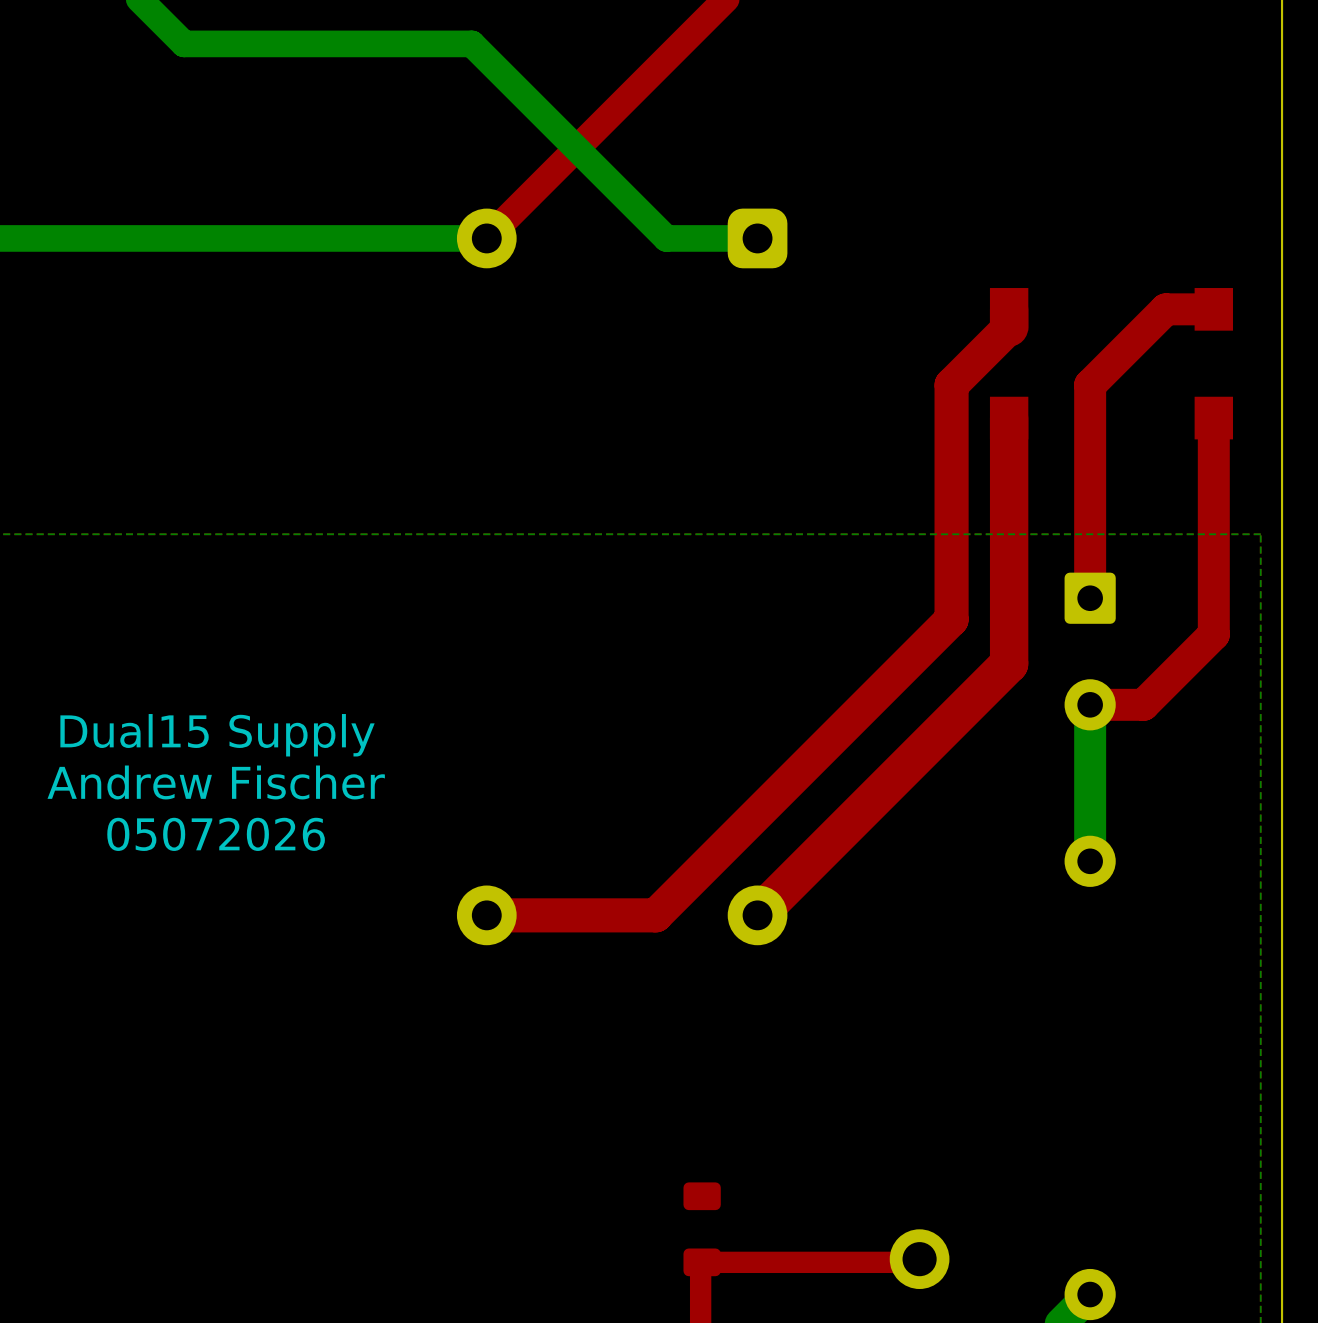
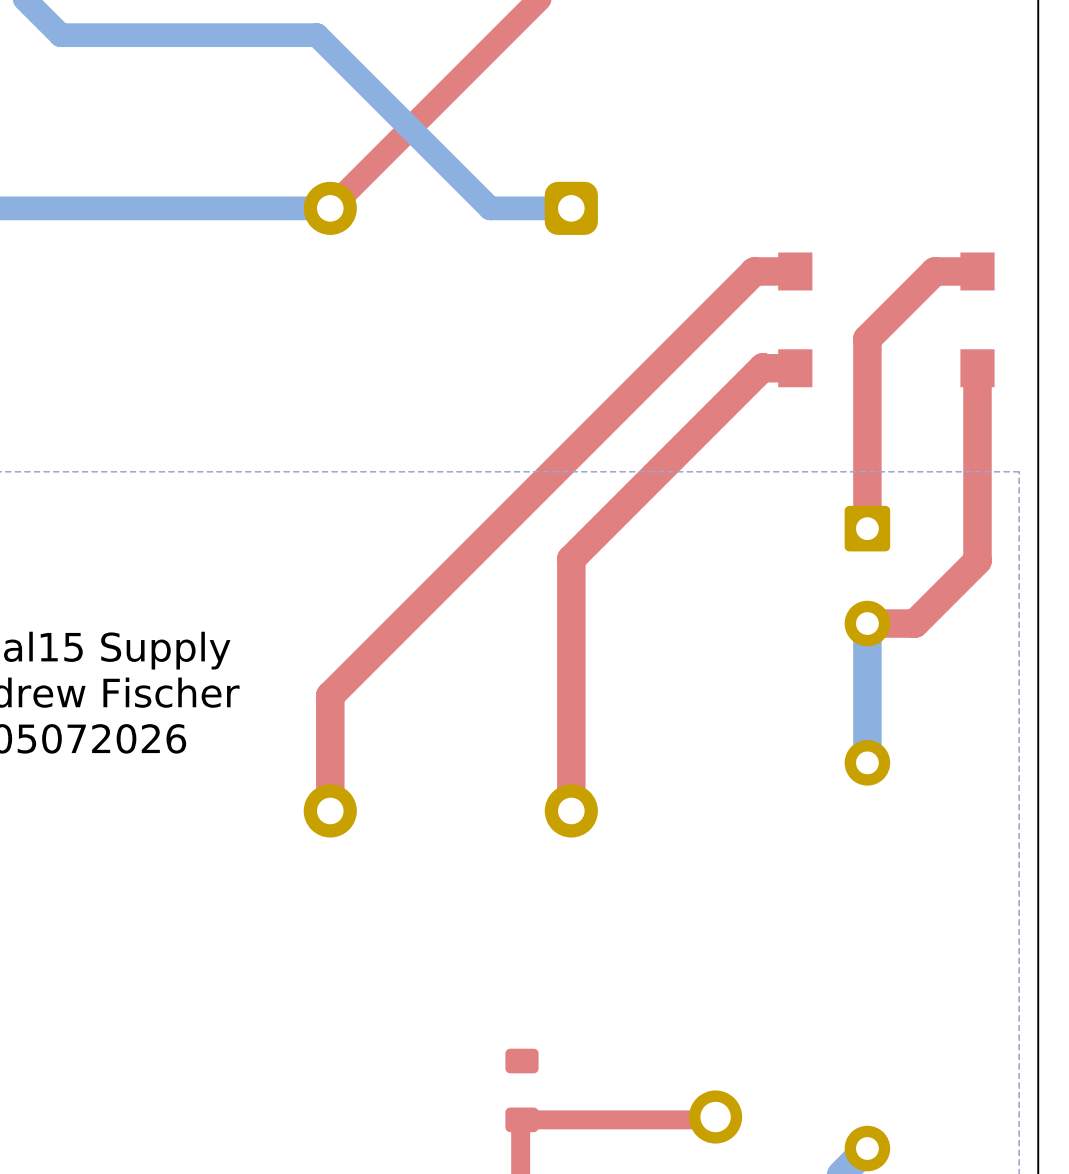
top track: (1009, 309) (1009, 327) (951, 385) (951, 619) (655, 915) (486, 915) -> (795, 271) (754, 271) (330, 695) (330, 810)
top track: (1009, 418) (1009, 663) (757, 915) -> (795, 368) (763, 367) (571, 559) (571, 810)

